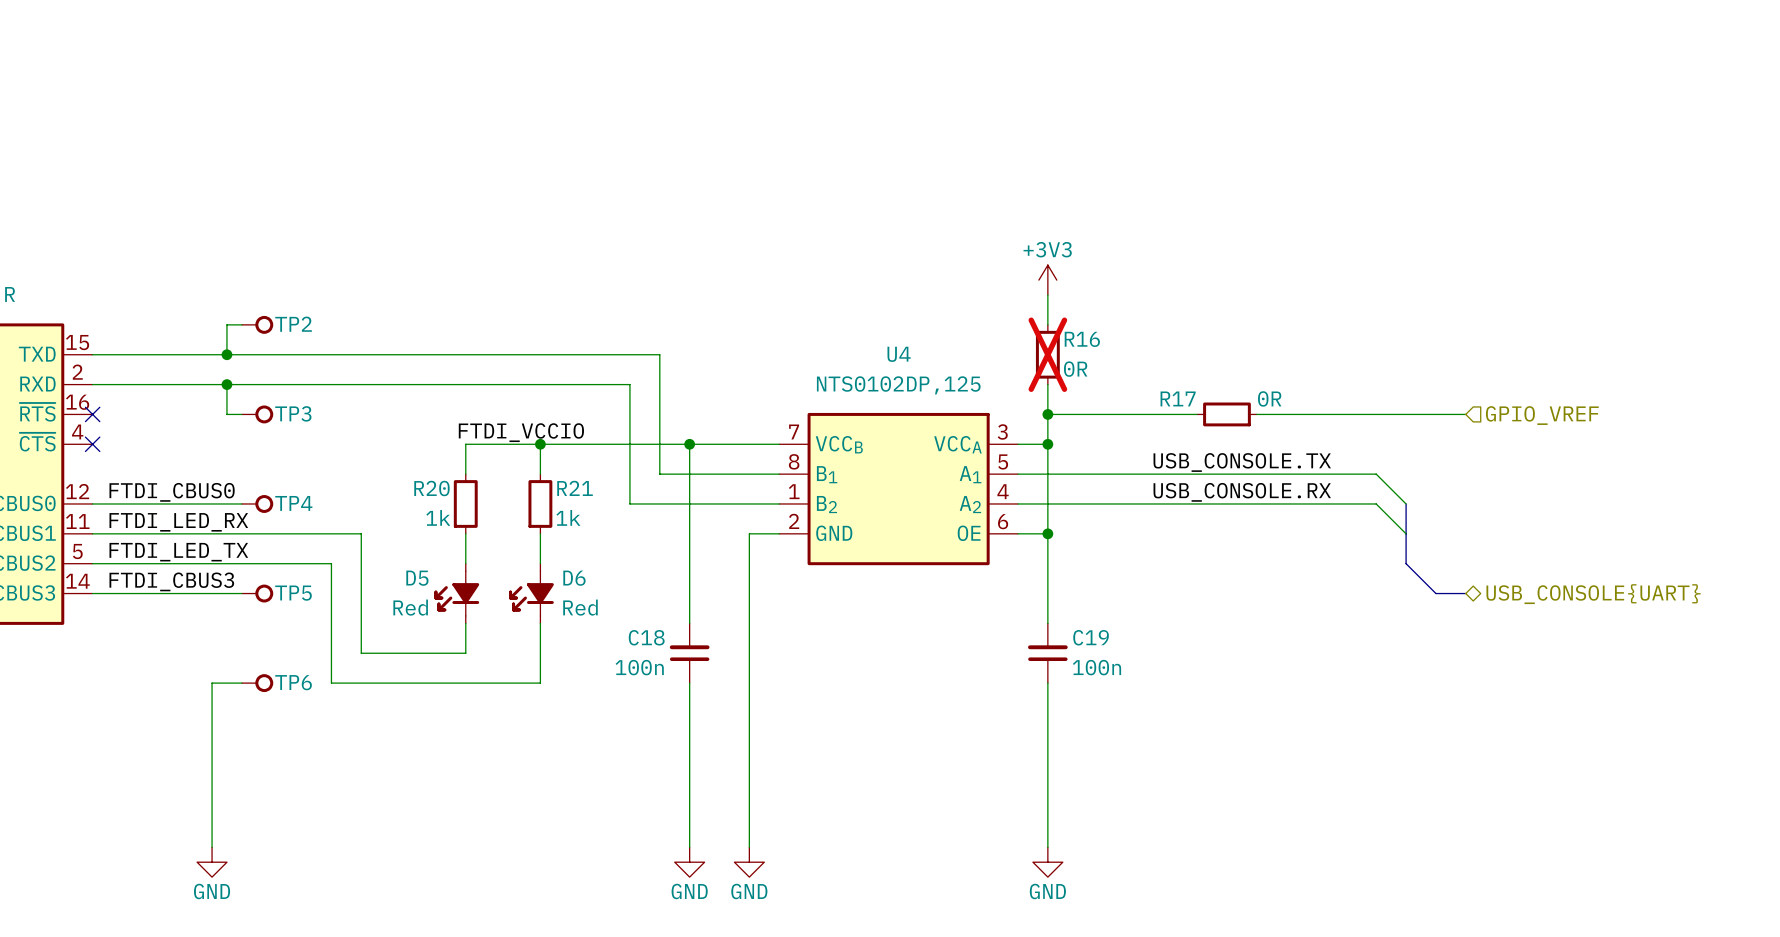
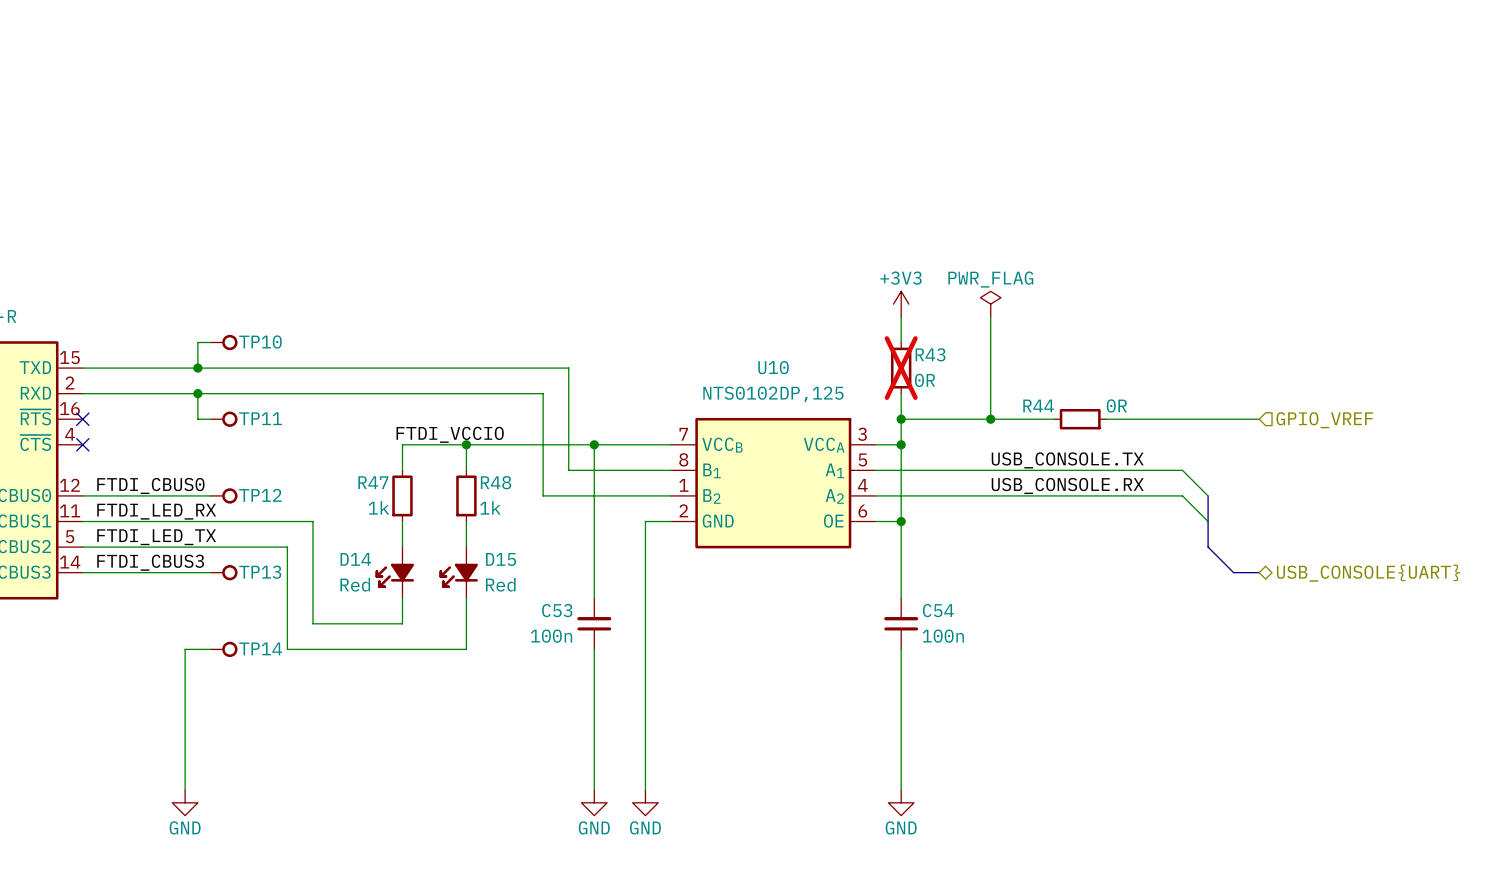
power symbol: none -> PWR_FLAG (990, 304)
wire: none -> (990, 316) (990, 419)
TP2 name: TP2 (293, 324) -> TP10 (260, 342)
R16 name: R16 (1082, 339) -> R43 (930, 354)
U4 name: U4 (899, 354) -> U10 (773, 367)
TP3 name: TP3 (293, 413) -> TP11 (260, 418)
junction: none -> (990, 419)
R17: (1226, 414) -> none
wire: (1256, 414) (1286, 414) -> (1029, 419) (1054, 419)
R44: none -> (1080, 419)
R20 name: R20 (431, 488) -> R47 (373, 482)
R21 name: R21 (575, 488) -> R48 (496, 482)
TP4 name: TP4 (293, 503) -> TP12 (260, 495)
D5 name: D5 (417, 578) -> D14 (355, 559)
D6 name: D6 (574, 578) -> D15 (501, 559)
TP5 name: TP5 (293, 593) -> TP13 (260, 572)
C18 name: C18 (646, 637) -> C53 (557, 610)
C19 name: C19 (1091, 637) -> C54 (938, 610)
TP6 name: TP6 (293, 682) -> TP14 (260, 648)

